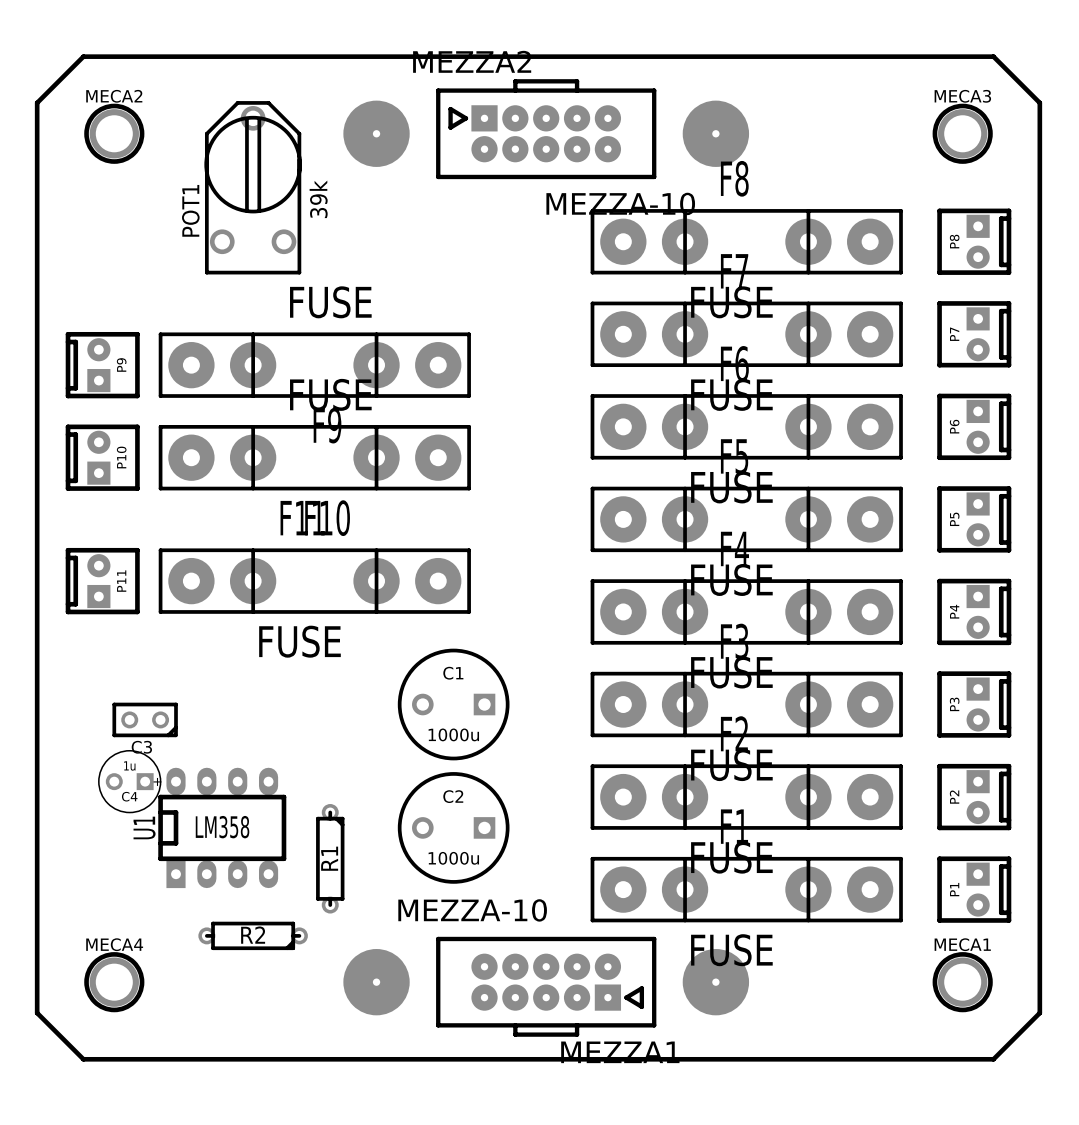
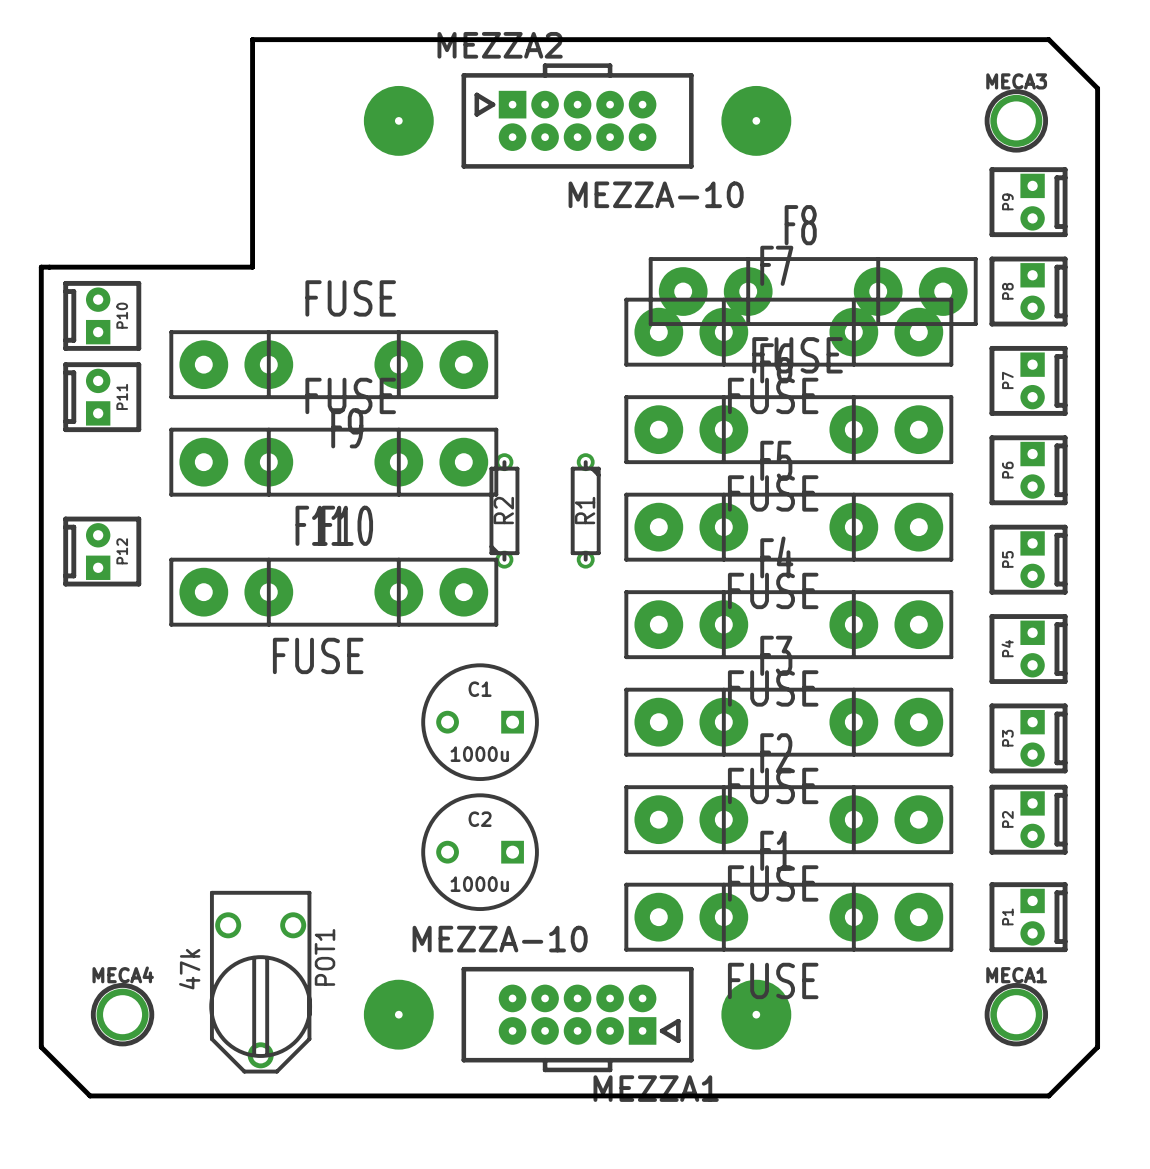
board edge: (237, 56) (83, 56) (37, 102) (37, 272) -> (252, 39) (252, 267) (41, 267)
MECA2: (114, 133) -> none
POT1 rotation: 0° (253, 187) -> 180° (260, 982)
POT1 position: (253, 187) -> (260, 982)
POT1 value: 39k (318, 199) -> 47k (189, 969)
F8 position: (746, 241) -> (813, 291)
P8 position: (974, 241) -> (1028, 291)
P7 position: (974, 334) -> (1028, 380)
P9 rotation: 0° (102, 365) -> 180° (1028, 202)
P9 position: (102, 365) -> (1028, 202)
P6 position: (974, 426) -> (1028, 470)
P10 position: (102, 457) -> (102, 315)
P5 position: (974, 519) -> (1028, 559)
P12: none -> (102, 551)
P11 position: (102, 581) -> (102, 397)
P4 position: (974, 611) -> (1028, 649)
P3 position: (974, 704) -> (1028, 738)
C3: (145, 719) -> none
C4: 1u (129, 781) -> none
U1: LM358 (222, 827) -> none
R1 position: (330, 858) -> (585, 510)
R2 rotation: 0° (253, 935) -> 90° clockwise (504, 510)
R2 position: (253, 935) -> (504, 510)

